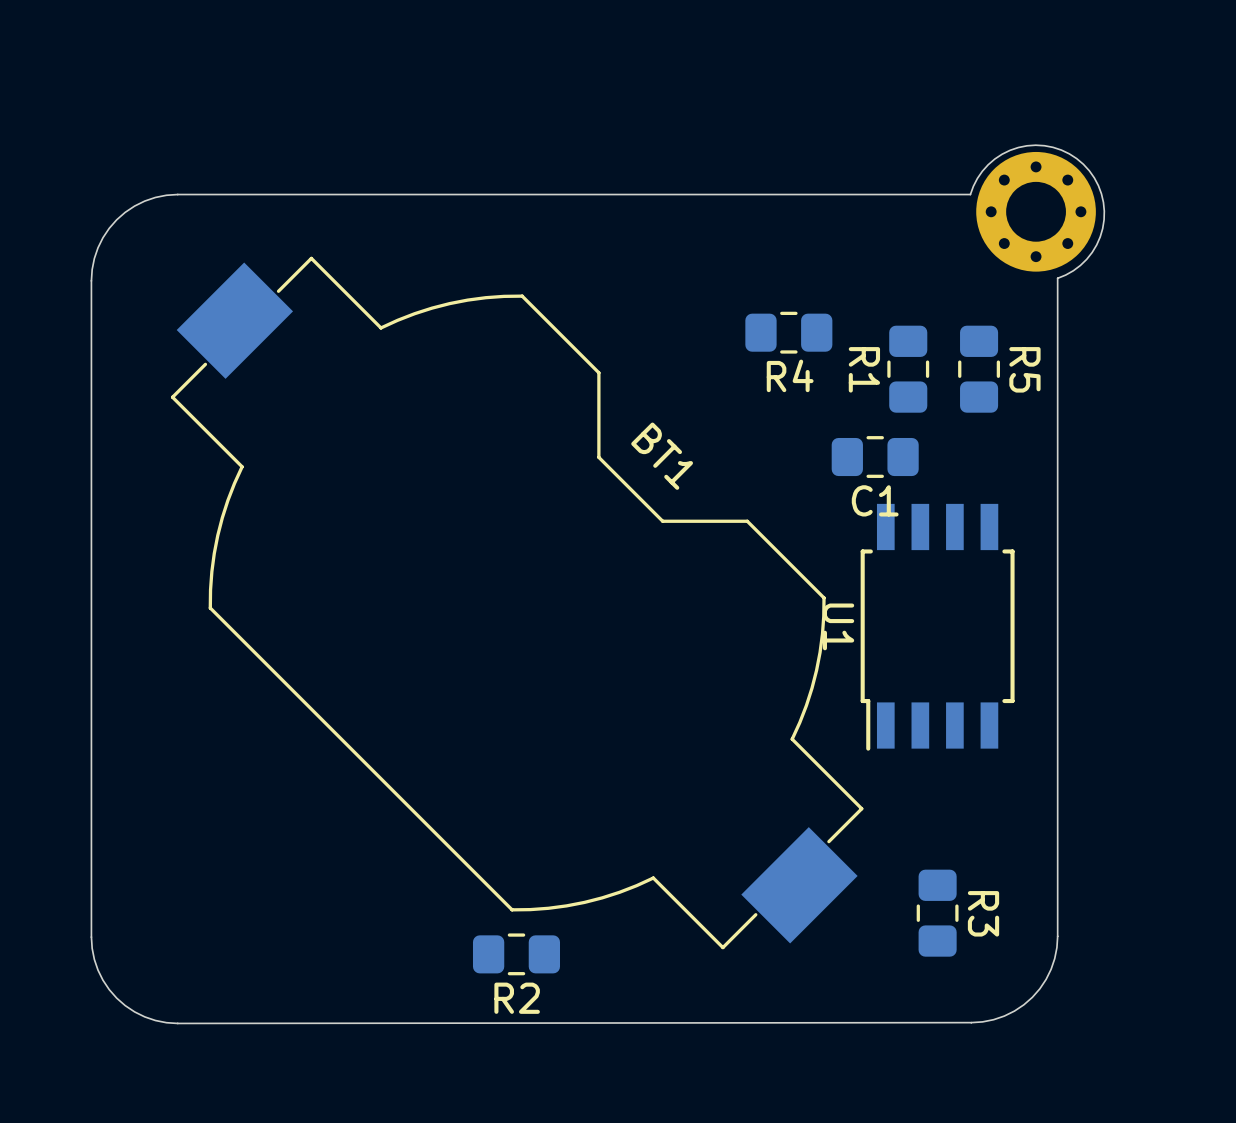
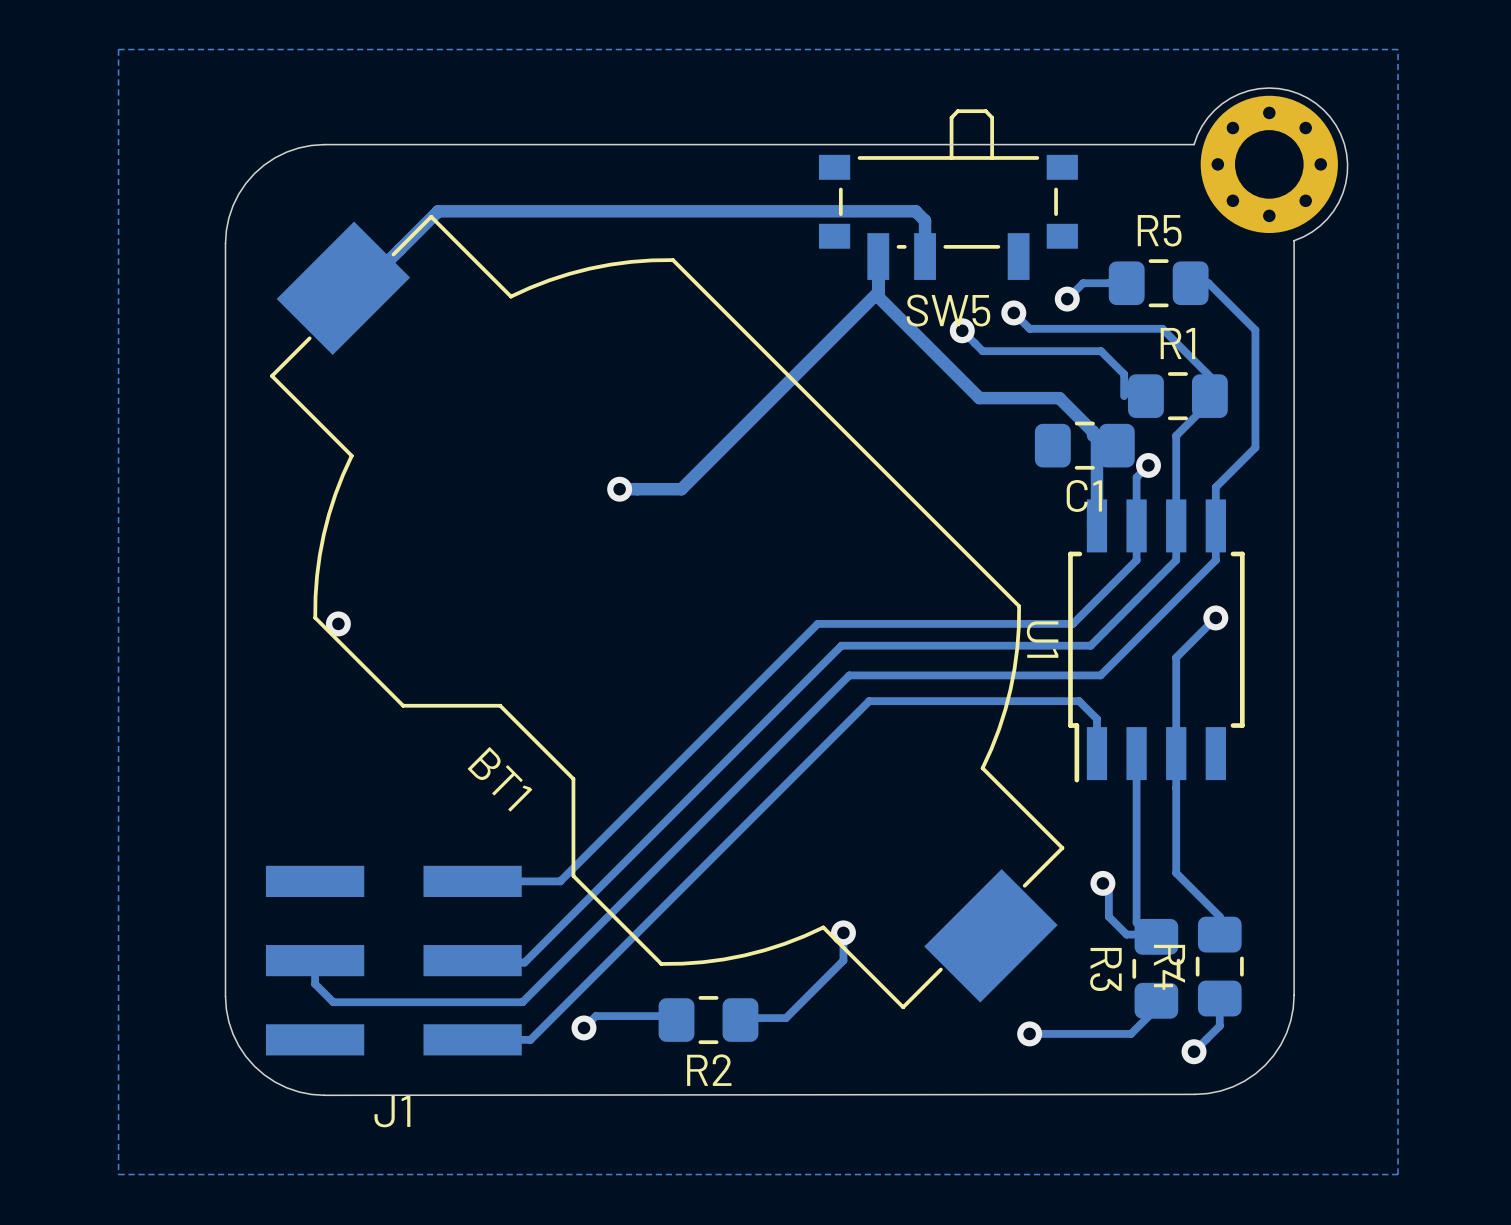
zone outline: none -> (1398, 49) (1398, 1174) (118, 1174) (118, 49) (1398, 49)
board edge: (212, 194) (166, 195) (134, 206) (116, 219) (102, 237) (92, 269) (91, 937) (98, 970) (116, 998) (144, 1016) (177, 1023) (971, 1022) -> (225, 996) (226, 1009) (233, 1034) (238, 1045) (254, 1066) (264, 1074) (286, 1087) (311, 1094) (1195, 1094)
board edge: none -> (324, 144) (298, 147) (286, 152) (275, 157) (254, 173) (238, 194) (233, 205) (226, 230) (225, 996)
SW5: none -> (948, 194)
track: none -> (878, 256) (878, 296) (979, 398) (1059, 398) (1093, 431) (1093, 435)
track: none -> (925, 256) (925, 220) (915, 211) (438, 211) (361, 288)
track: none -> (1126, 283) (1083, 283) (1067, 299)
track: none -> (1190, 283) (1208, 283) (1255, 330) (1255, 447) (1215, 487) (1215, 560) (1100, 675) (849, 675) (522, 1002) (333, 1002) (315, 984) (315, 960)
track: none -> (878, 292) (681, 489) (619, 489)
via: none -> (1067, 299)
R4 rotation: 0° (788, 332) -> 90° clockwise (1219, 966)
R4 position: (788, 332) -> (1219, 966)
track: none -> (1013, 312) (1029, 328) (1162, 328) (1213, 380) (1213, 398) (1176, 435) (1176, 560) (1090, 645) (841, 645) (524, 962) (474, 962) (472, 960)
via: none -> (1013, 312)
track: none -> (962, 330) (982, 351) (1101, 351) (1124, 374) (1124, 396)
via: none -> (962, 330)
R1 rotation: 0° (908, 369) -> 90° clockwise (1177, 396)
R1 position: (908, 369) -> (1177, 396)
R5 rotation: 0° (979, 369) -> 90° clockwise (1158, 283)
R5 position: (979, 369) -> (1158, 283)
R5 name position: R5 (1024, 369) -> R5 (1159, 230)
track: none -> (1096, 435) (1096, 521)
track: none -> (1148, 465) (1136, 477) (1136, 560) (1072, 623) (817, 623) (560, 881) (472, 881)
via: none -> (1148, 465)
via: none -> (619, 489)
BT1 rotation: 0° (517, 602) -> 180° (667, 612)
track: none -> (1215, 617) (1176, 657) (1176, 873) (1219, 916) (1219, 934)
via: none -> (1215, 617)
via: none -> (338, 623)
track: none -> (1096, 753) (1096, 718) (1079, 701) (869, 701) (530, 1039) (472, 1039)
track: none -> (1136, 753) (1136, 922) (1148, 934) (1126, 934) (1108, 916) (1108, 889) (1102, 883)
via: none -> (1102, 883)
track: none -> (843, 932) (843, 960) (786, 1018) (734, 1018)
via: none -> (843, 932)
J1: none -> (393, 960)
R3 name position: R3 (983, 913) -> R3 (1105, 969)
track: none -> (1148, 998) (1148, 1016) (1131, 1033) (1029, 1033)
track: none -> (1219, 998) (1219, 1025) (1194, 1051)
track: none -> (669, 1016) (595, 1016) (584, 1027)
R2 position: (516, 954) -> (708, 1020)
via: none -> (584, 1027)
via: none -> (1029, 1033)
via: none -> (1194, 1051)

